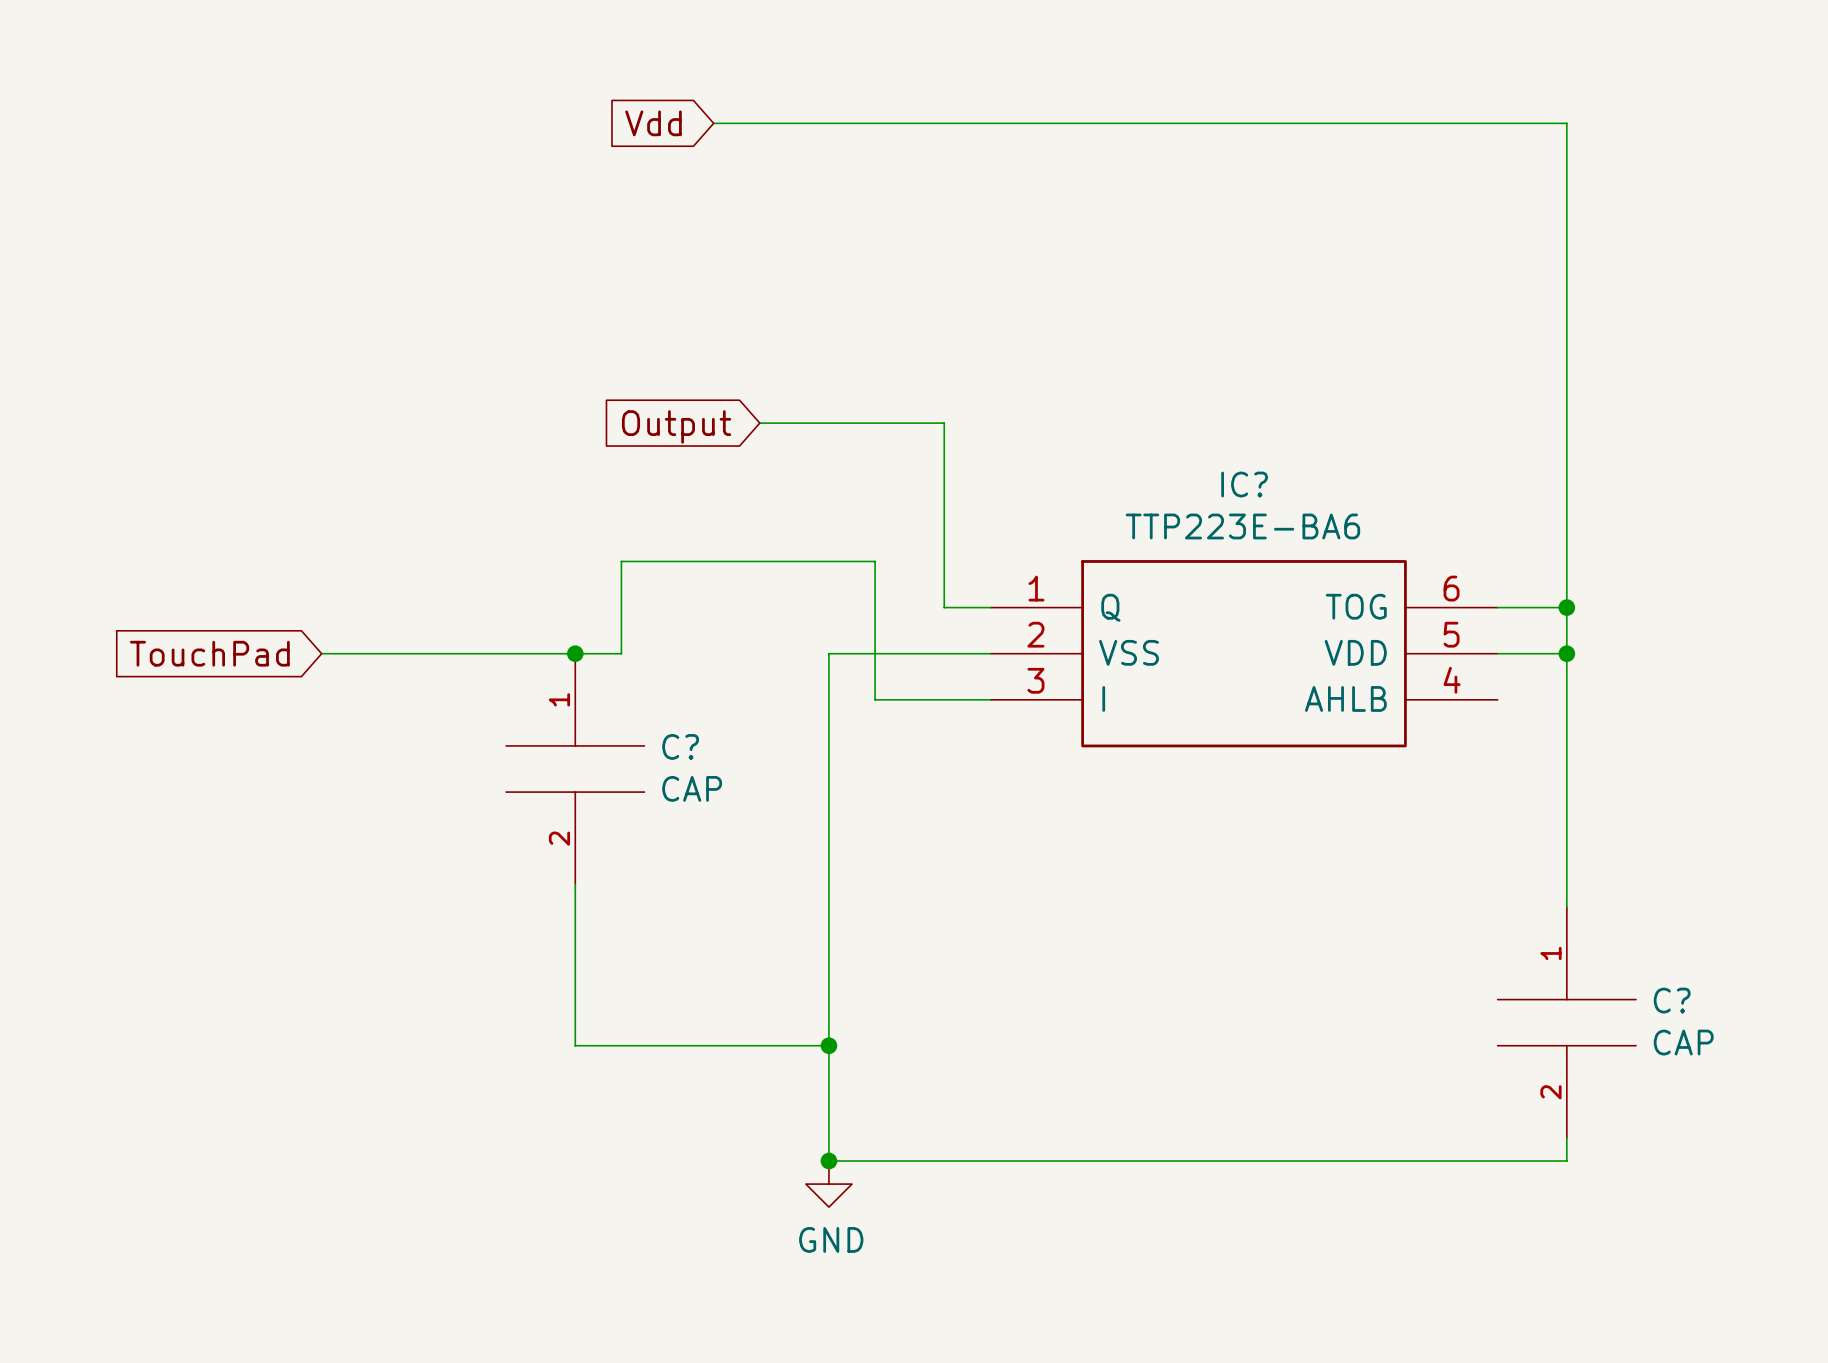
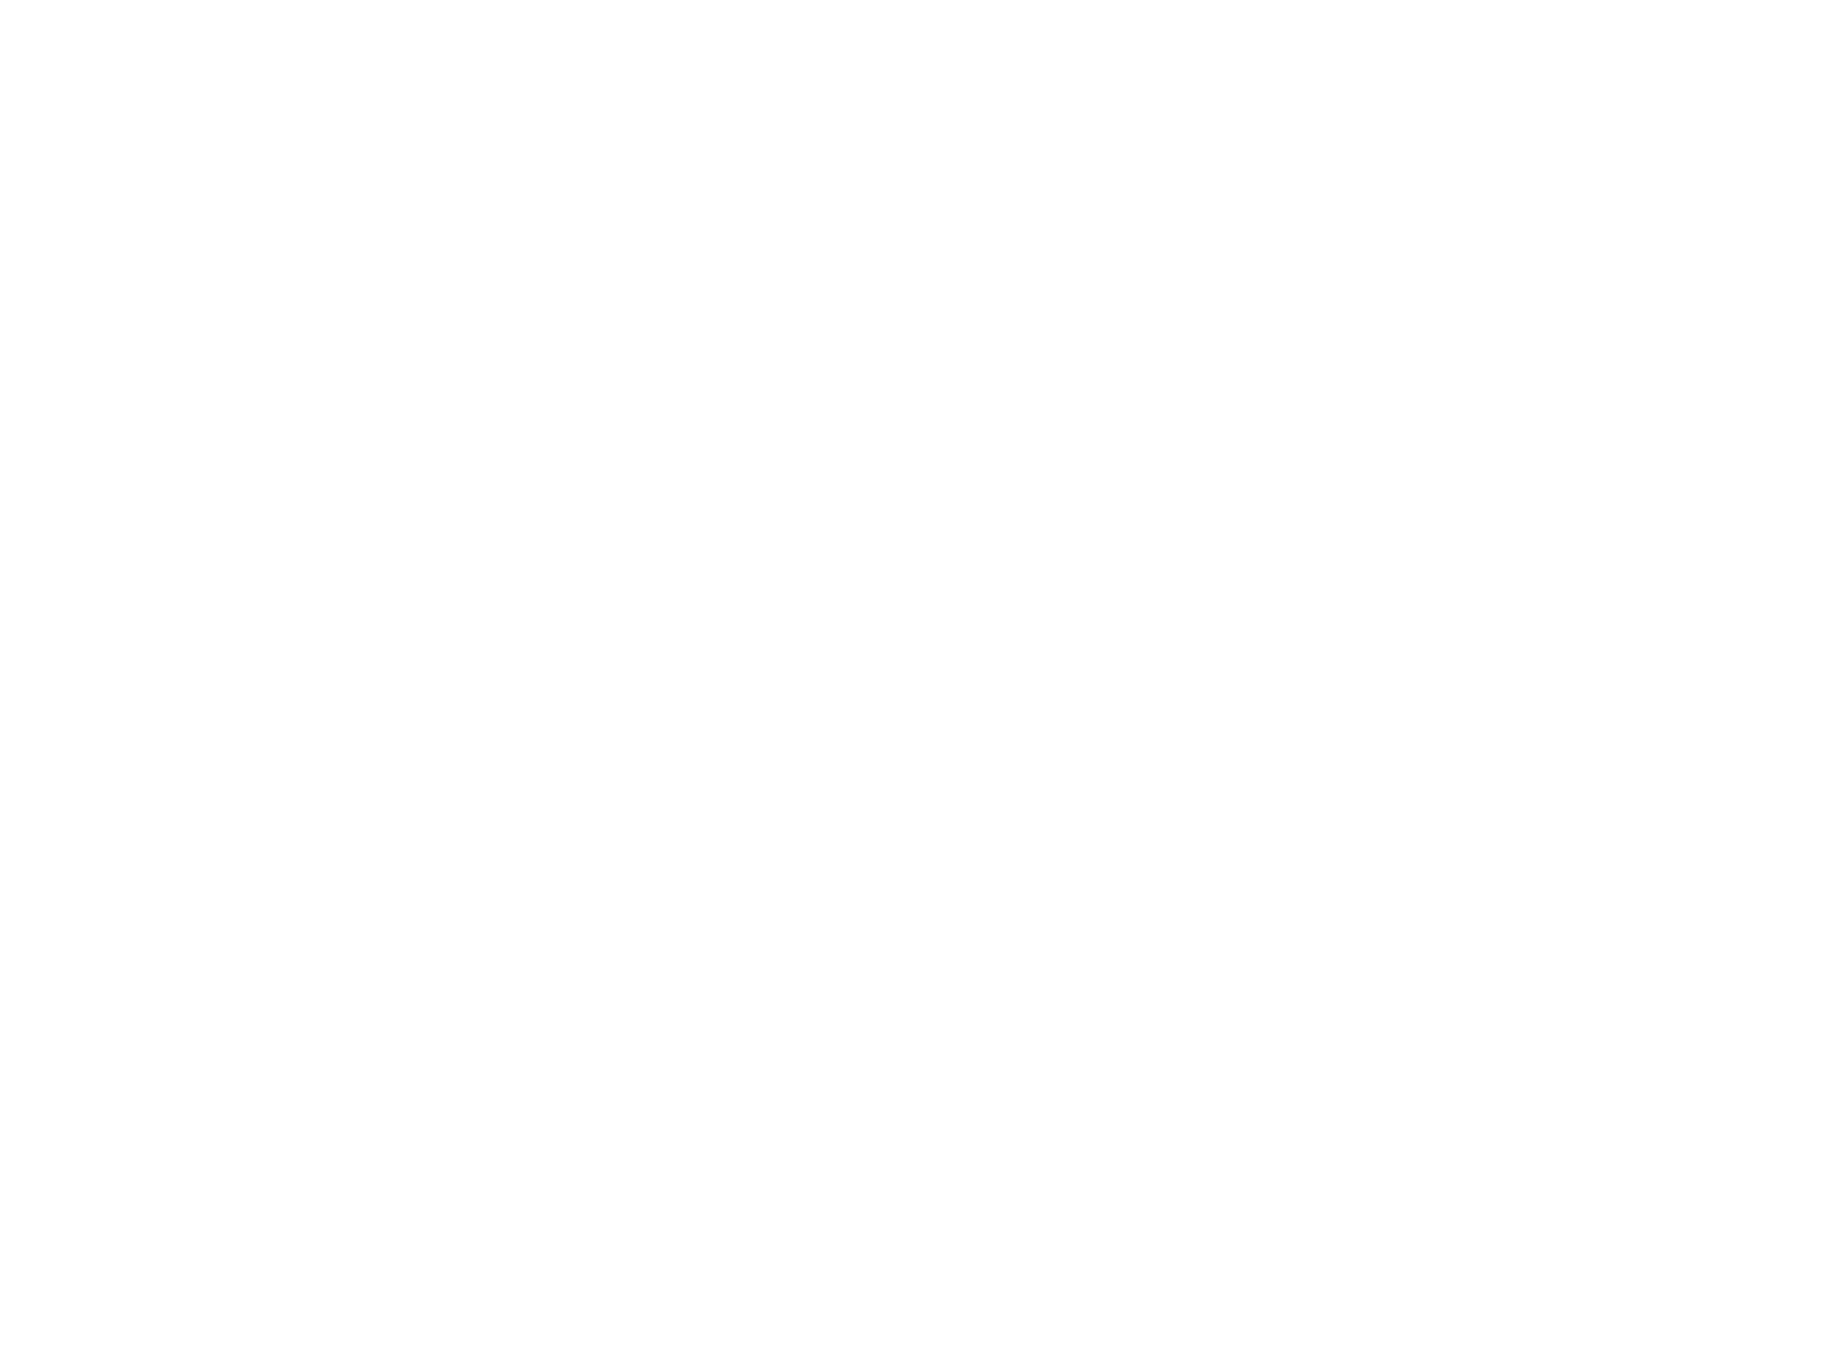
global label: Vdd (653, 123) -> none
wire: (713, 123) (1566, 123) (1566, 907) -> none
wire: (759, 423) (944, 423) (944, 607) (990, 607) -> none
global label: Output (676, 426) -> none
wire: (1497, 607) (1566, 607) -> none
junction: (1566, 607) -> none
global label: TouchPad (209, 653) -> none
wire: (321, 653) (621, 653) (621, 561) (875, 561) (875, 699) (990, 699) -> none
junction: (575, 653) -> none
wire: (990, 653) (828, 653) (828, 1161) (1566, 1161) (1566, 1137) -> none
IC?: TTP223E-BA6 (1244, 653) -> none
wire: (1497, 653) (1566, 653) -> none
junction: (1566, 653) -> none
C?: CAP (575, 769) -> none
wire: (575, 884) (575, 1045) (828, 1045) -> none
C?: CAP (1566, 1022) -> none
junction: (828, 1045) -> none
junction: (828, 1161) -> none
power symbol: GND (828, 1184) -> none

